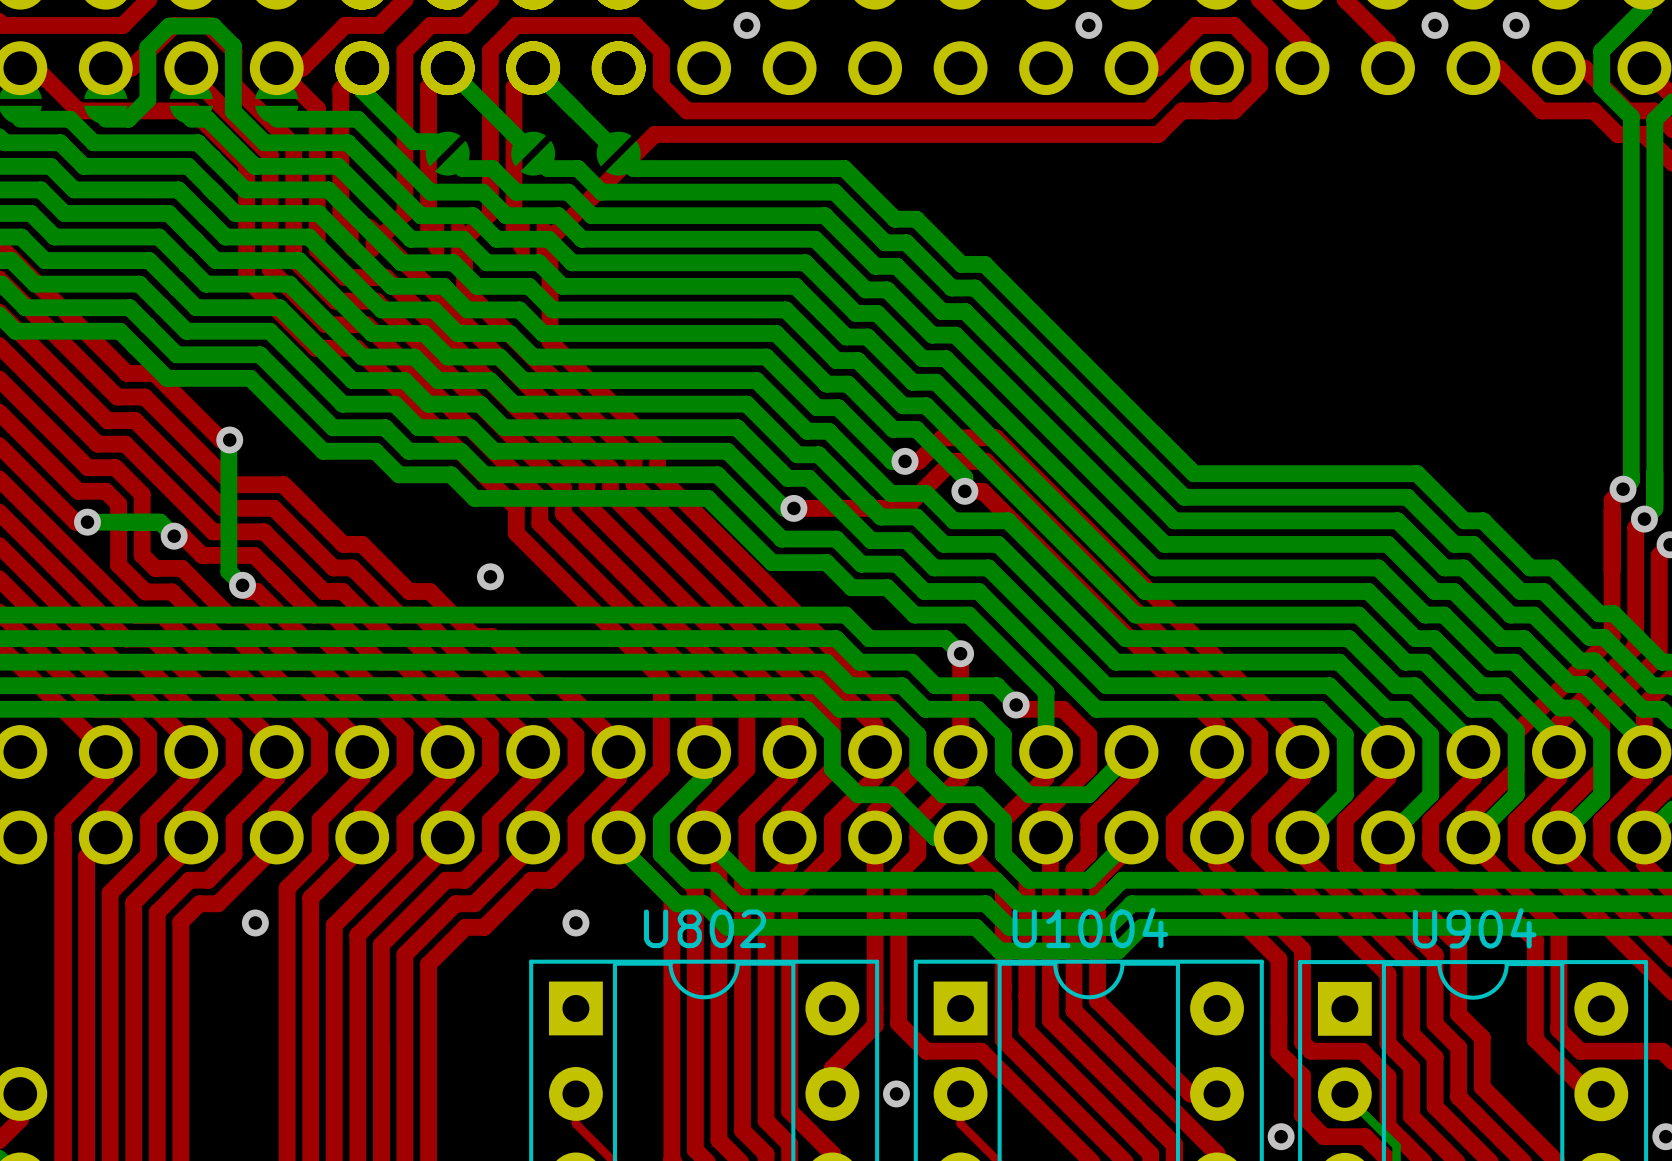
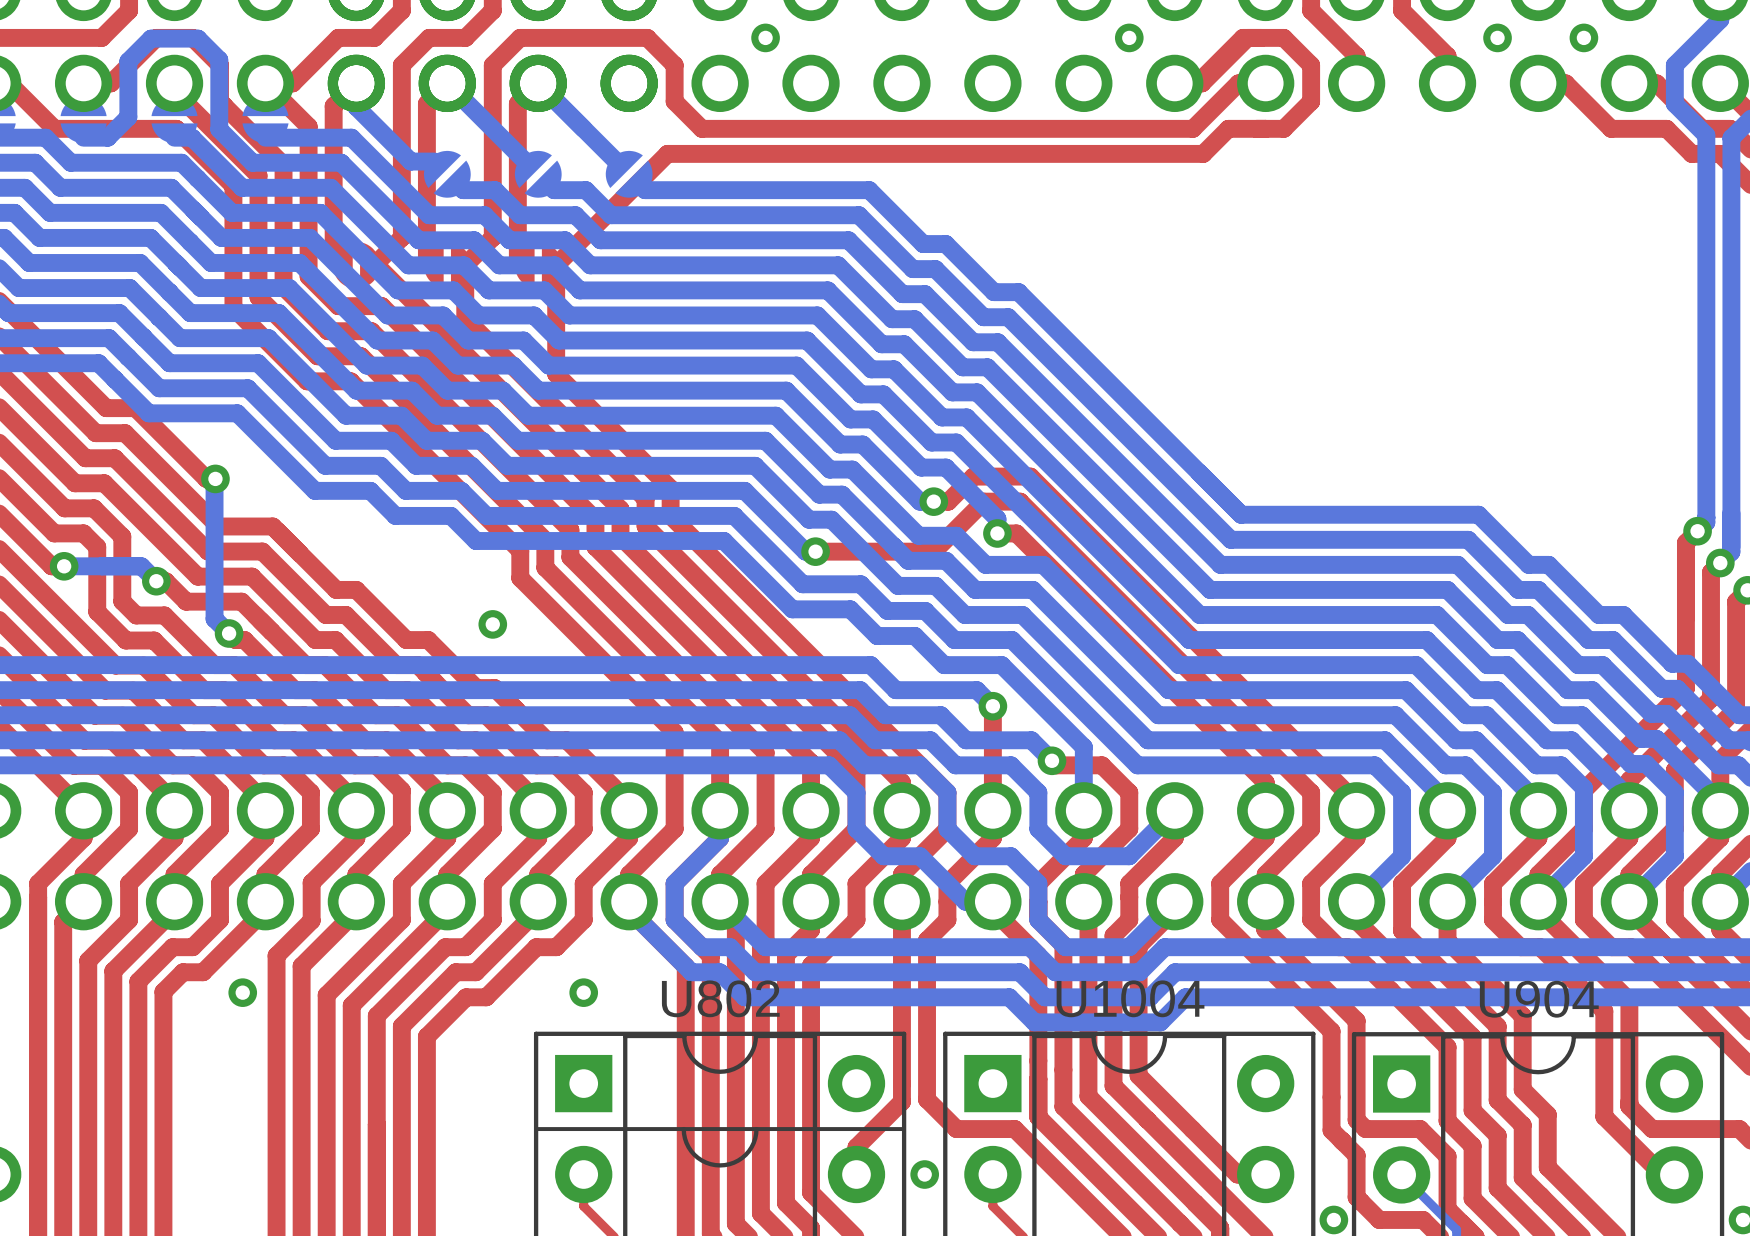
line: none -> (756, 1129) (753, 1142) (745, 1154) (734, 1162) (720, 1165) (706, 1162) (694, 1154) (686, 1142) (683, 1129)
line: none -> (901, 1129) (538, 1129)

